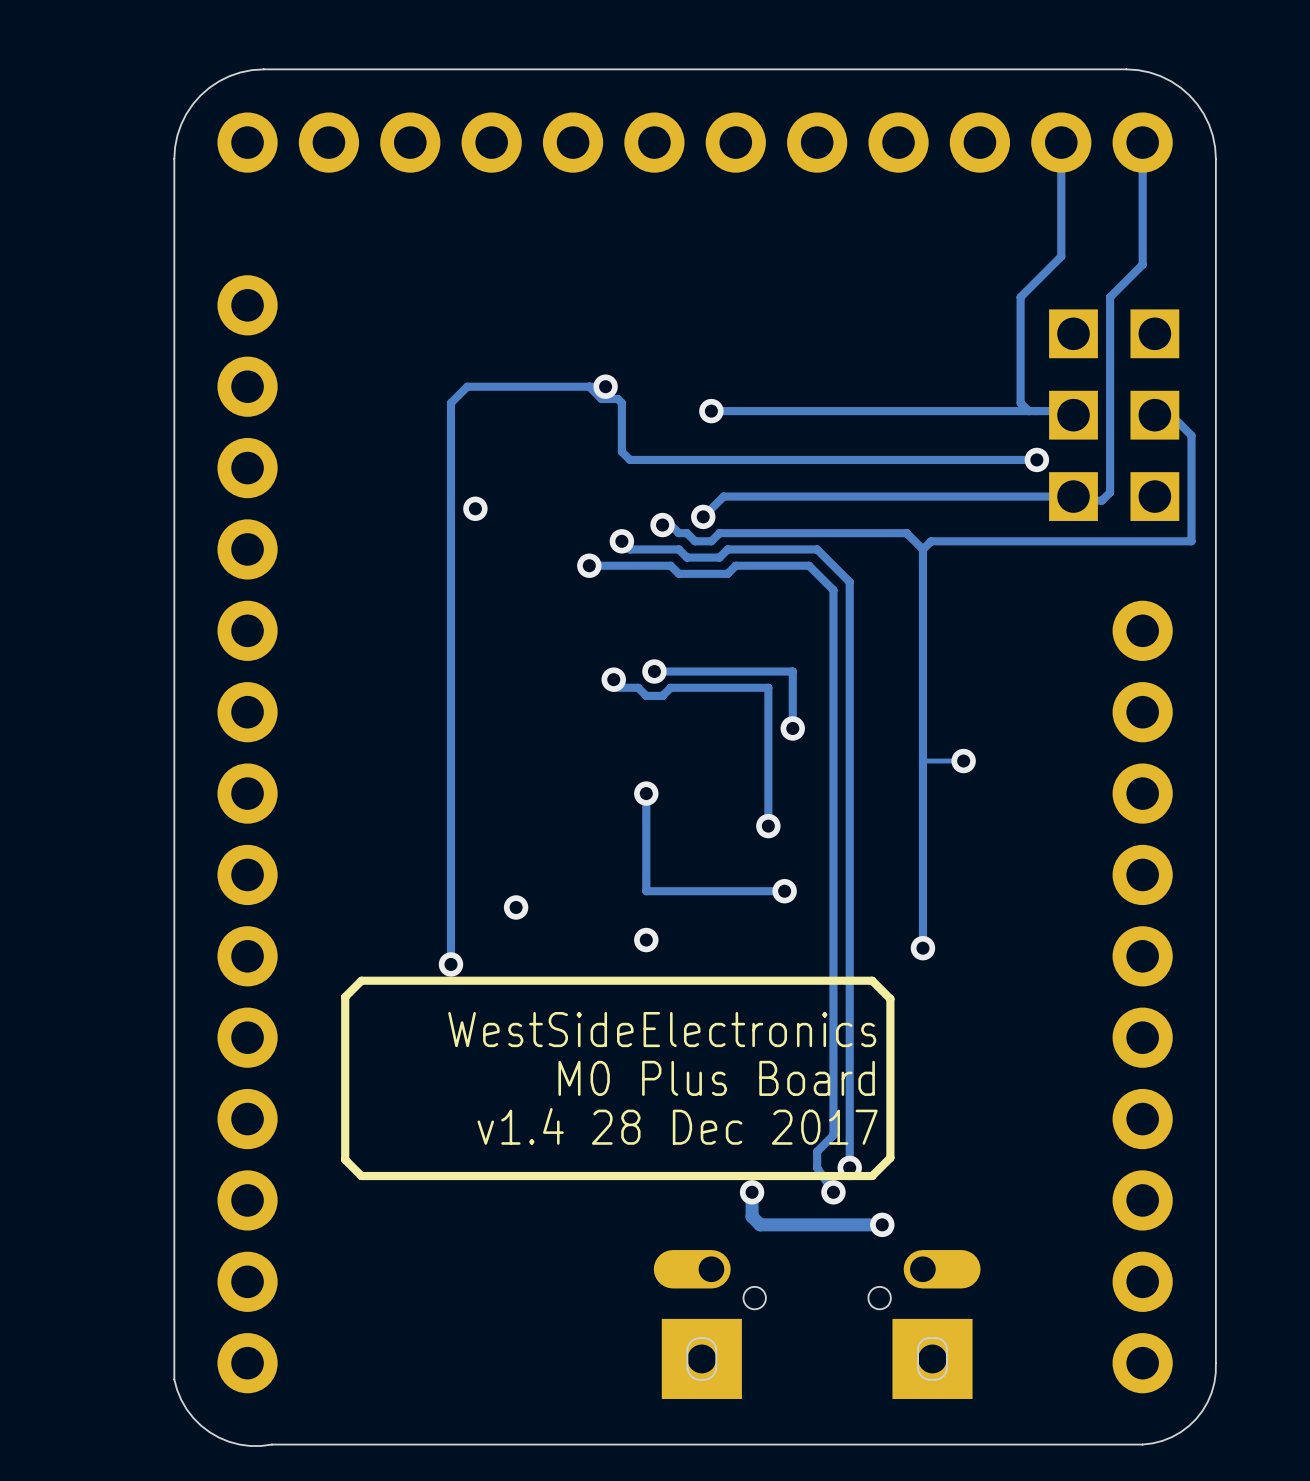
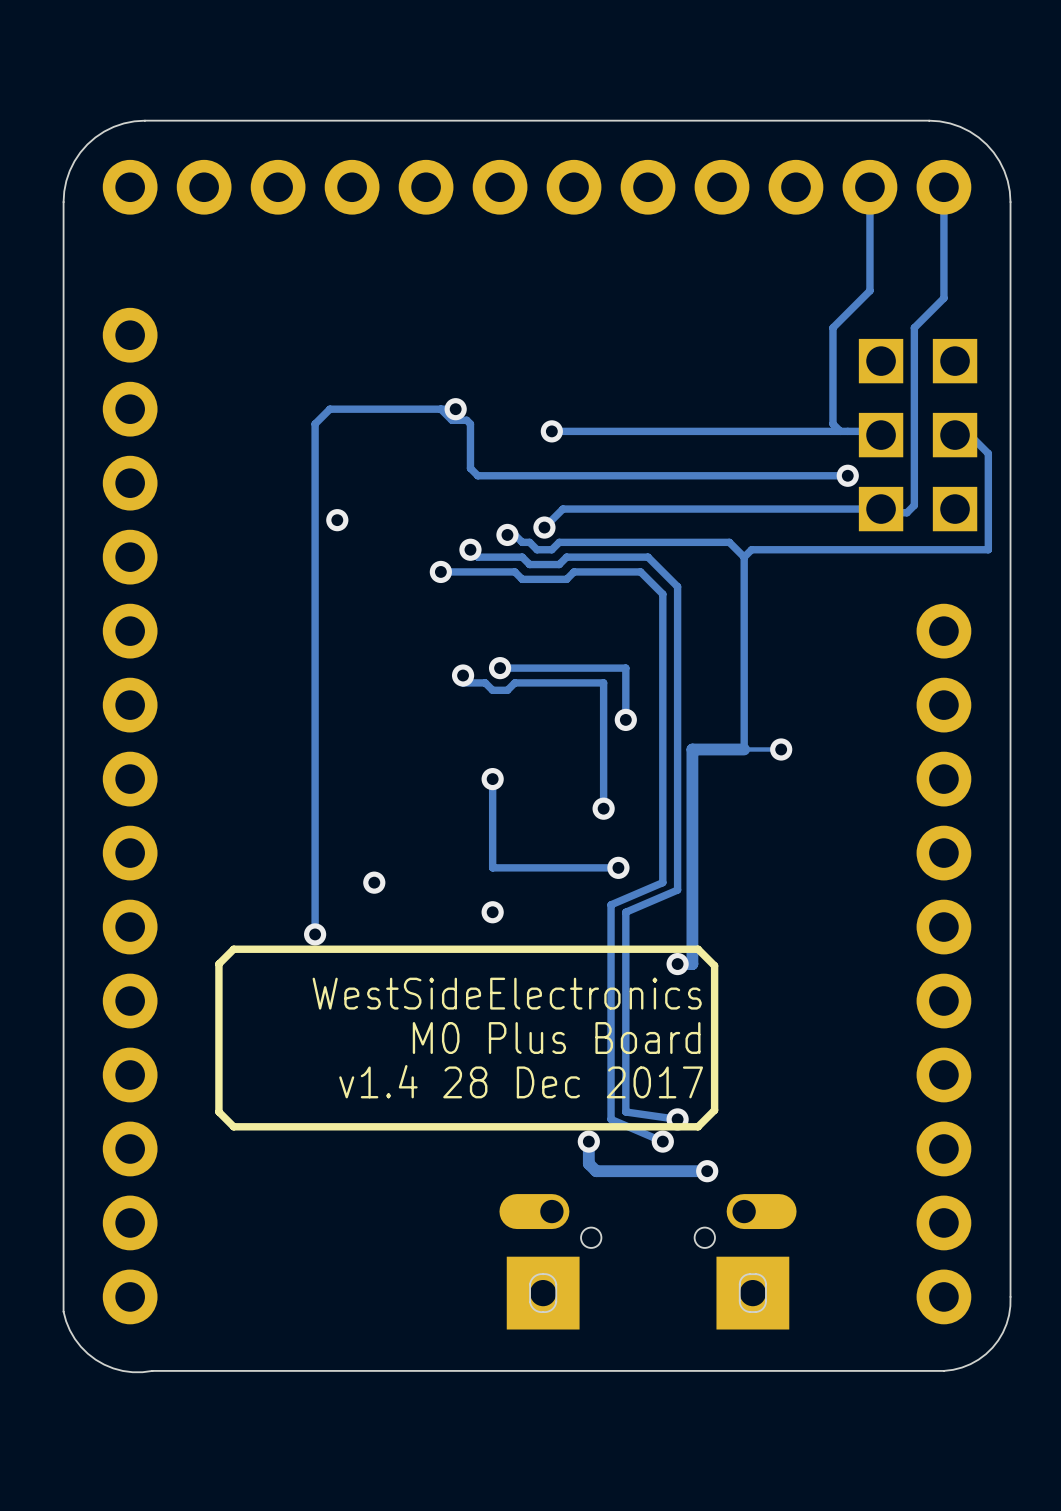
track: (922, 761) (922, 948) -> (744, 749) (692, 749) (692, 964) (677, 964)
track: (833, 907) (833, 1135) (817, 1151) (817, 1167) (833, 1192) -> (662, 882) (611, 904) (611, 1119) (662, 1141)
track: (849, 915) (849, 1167) -> (677, 890) (625, 912) (625, 1112) (677, 1119)
via position: (922, 948) -> (677, 964)

